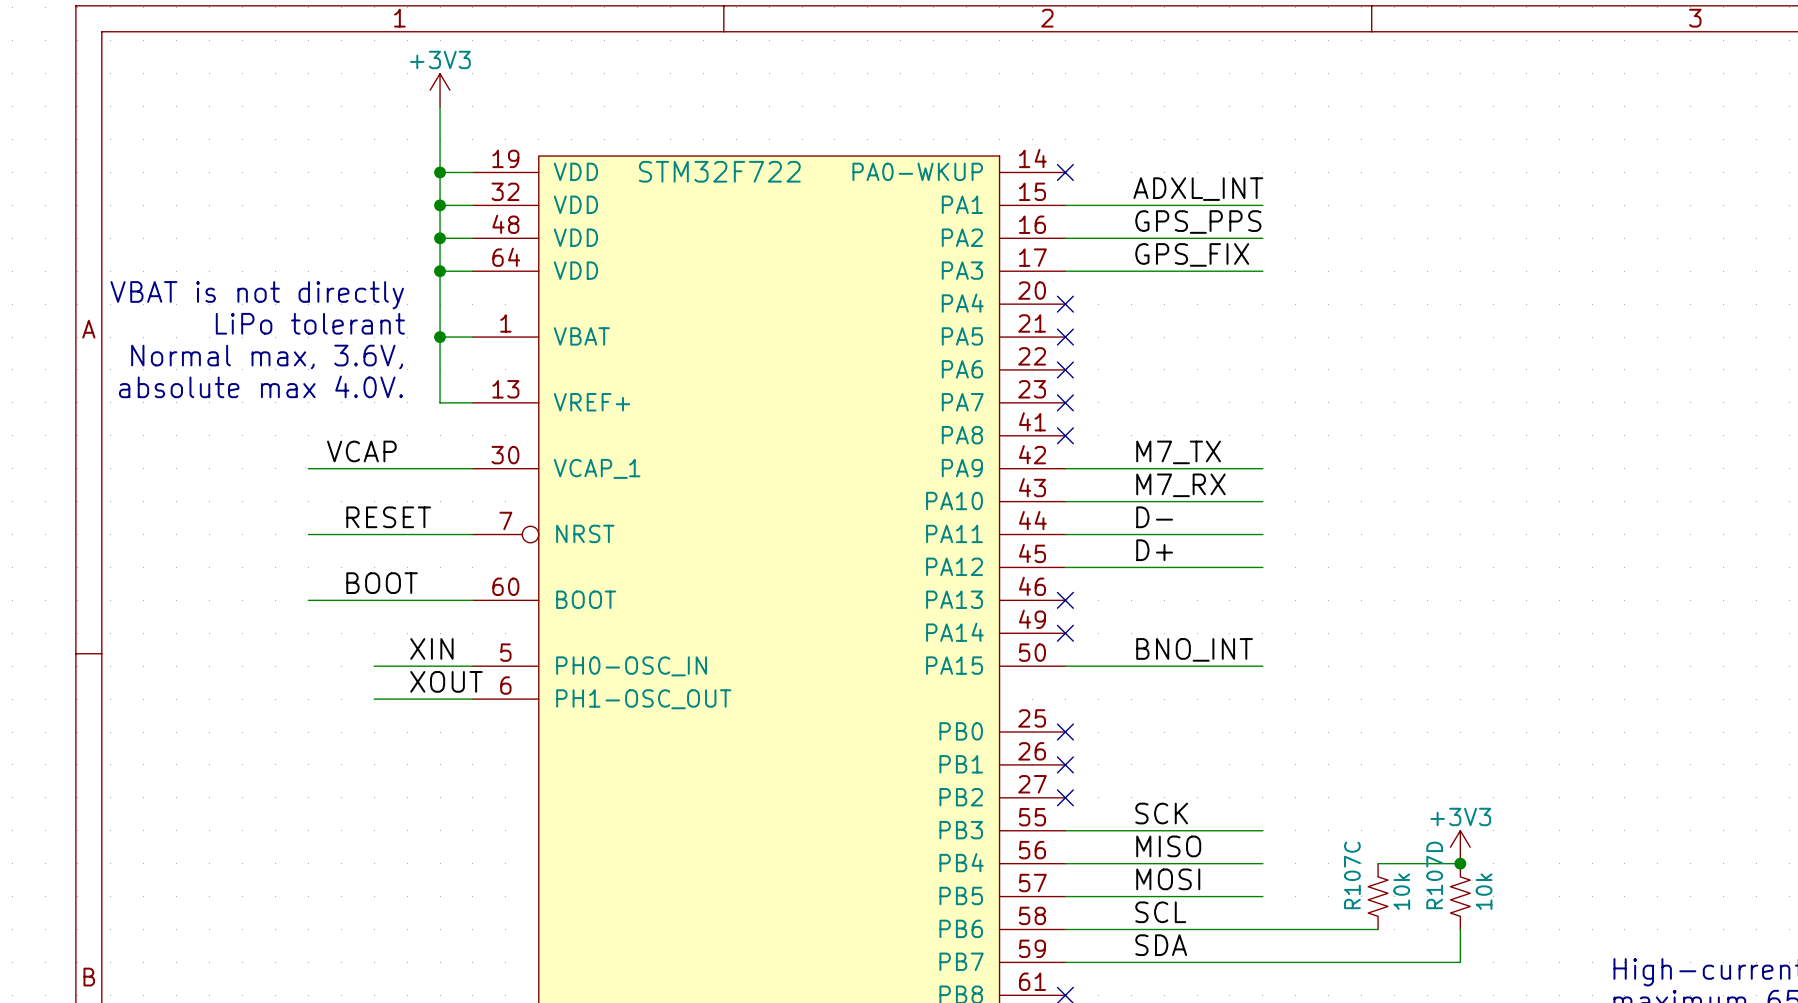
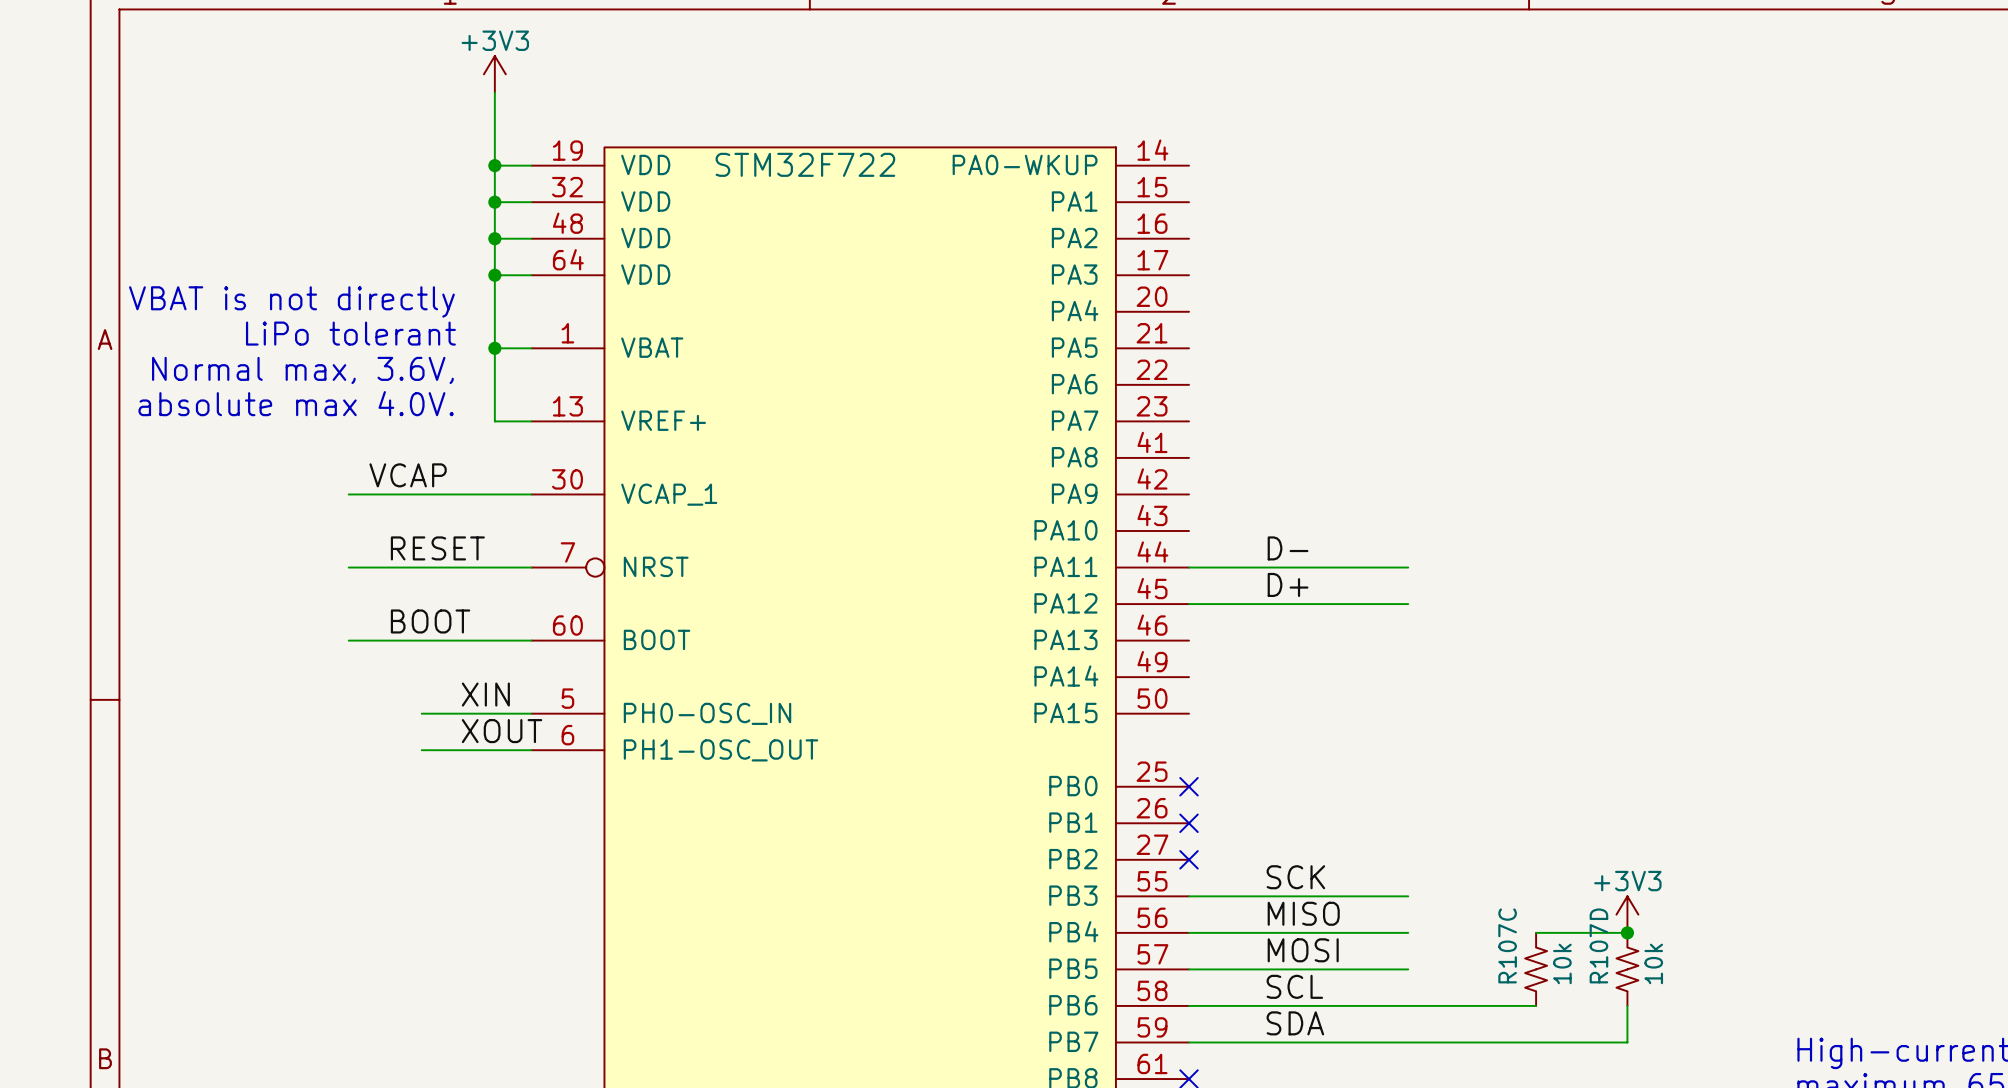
no-connect mark: (1065, 172) -> none
label: ADXL_INT (1198, 189) -> none
wire: (1065, 205) (1262, 205) -> none
label: GPS_PPS (1198, 222) -> none
wire: (1065, 238) (1262, 238) -> none
label: GPS_FIX (1192, 254) -> none
wire: (1065, 271) (1262, 271) -> none
no-connect mark: (1065, 304) -> none
no-connect mark: (1065, 337) -> none
no-connect mark: (1065, 369) -> none
no-connect mark: (1065, 402) -> none
no-connect mark: (1065, 435) -> none
label: M7_TX (1178, 452) -> none
wire: (1065, 468) (1262, 468) -> none
label: M7_RX (1180, 485) -> none
wire: (1065, 501) (1262, 501) -> none
no-connect mark: (1065, 600) -> none
no-connect mark: (1065, 633) -> none
label: BNO_INT (1194, 649) -> none
wire: (1065, 666) (1262, 666) -> none

